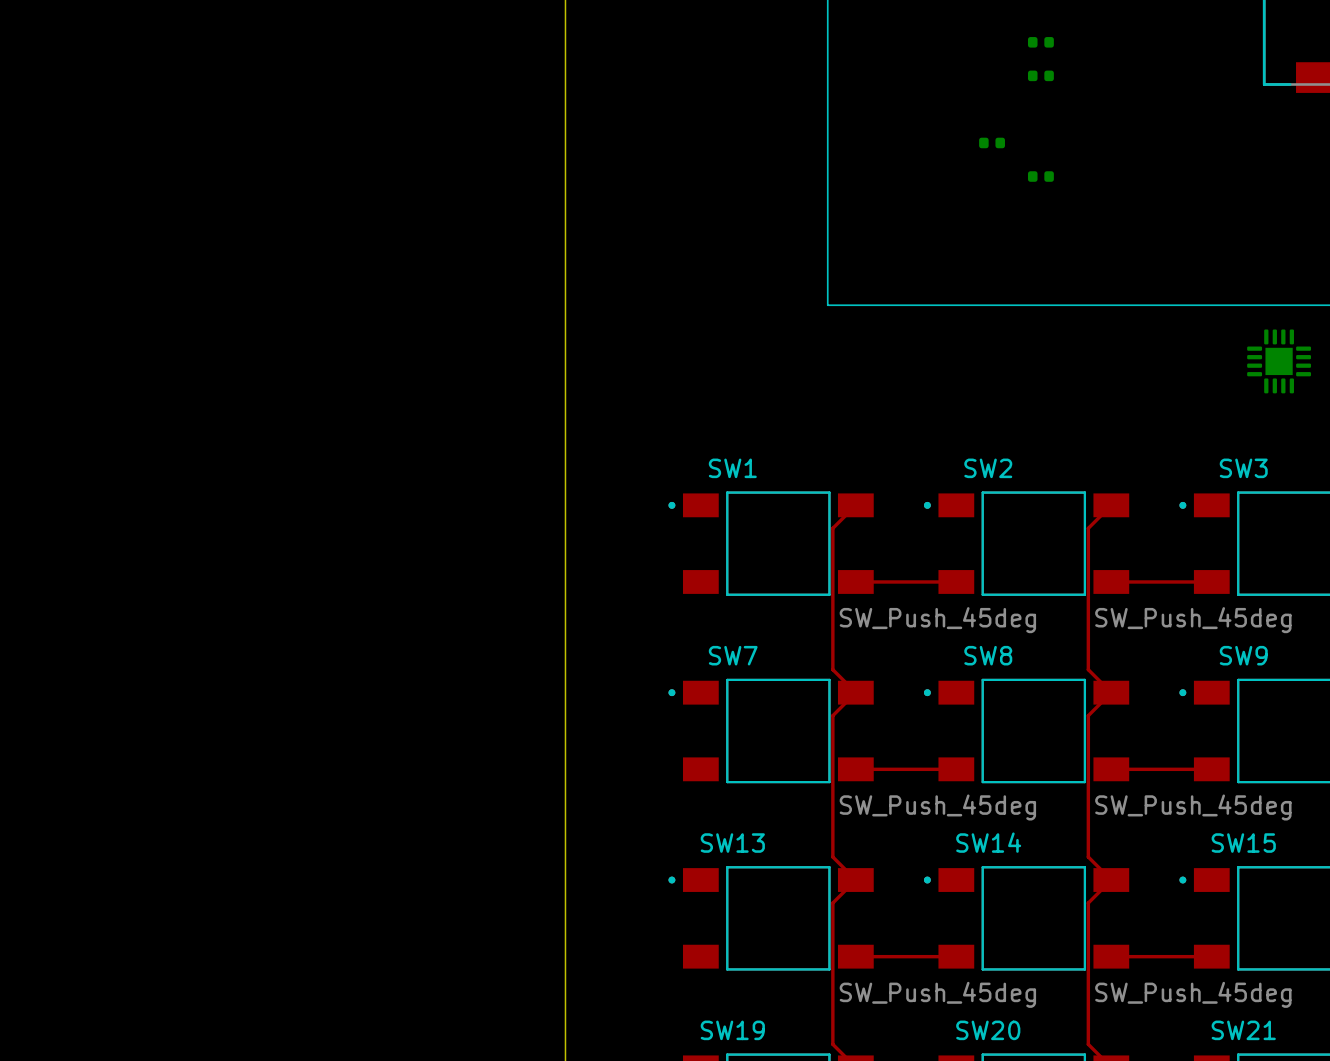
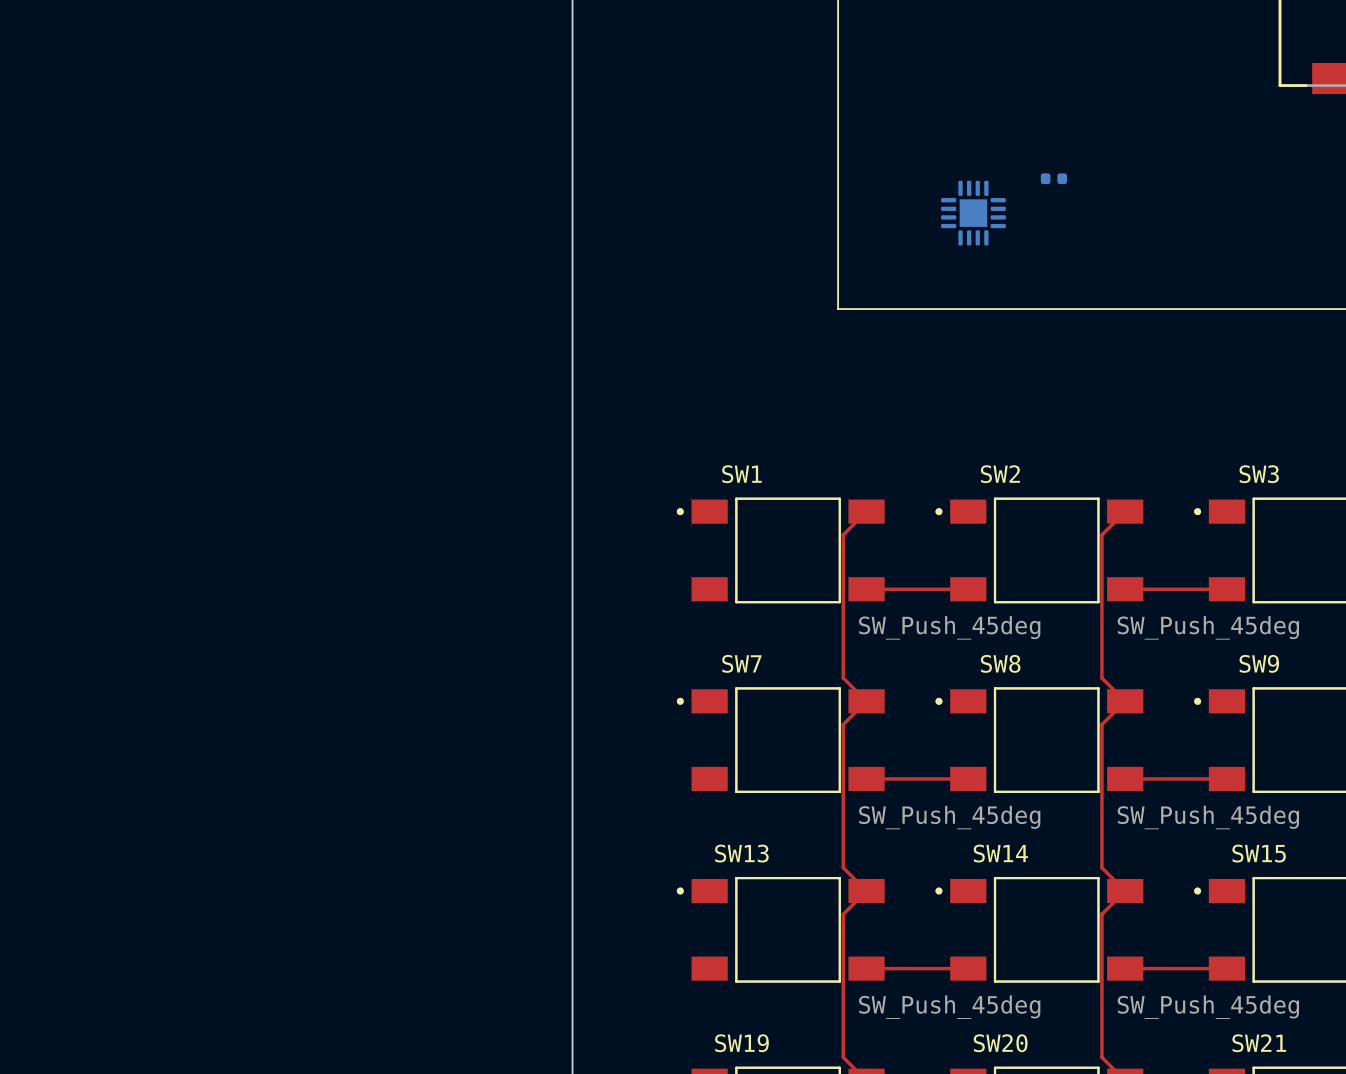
part: (1040, 42) -> none
part: (1040, 75) -> none
part: (992, 142) -> none
part position: (1279, 361) -> (973, 213)

